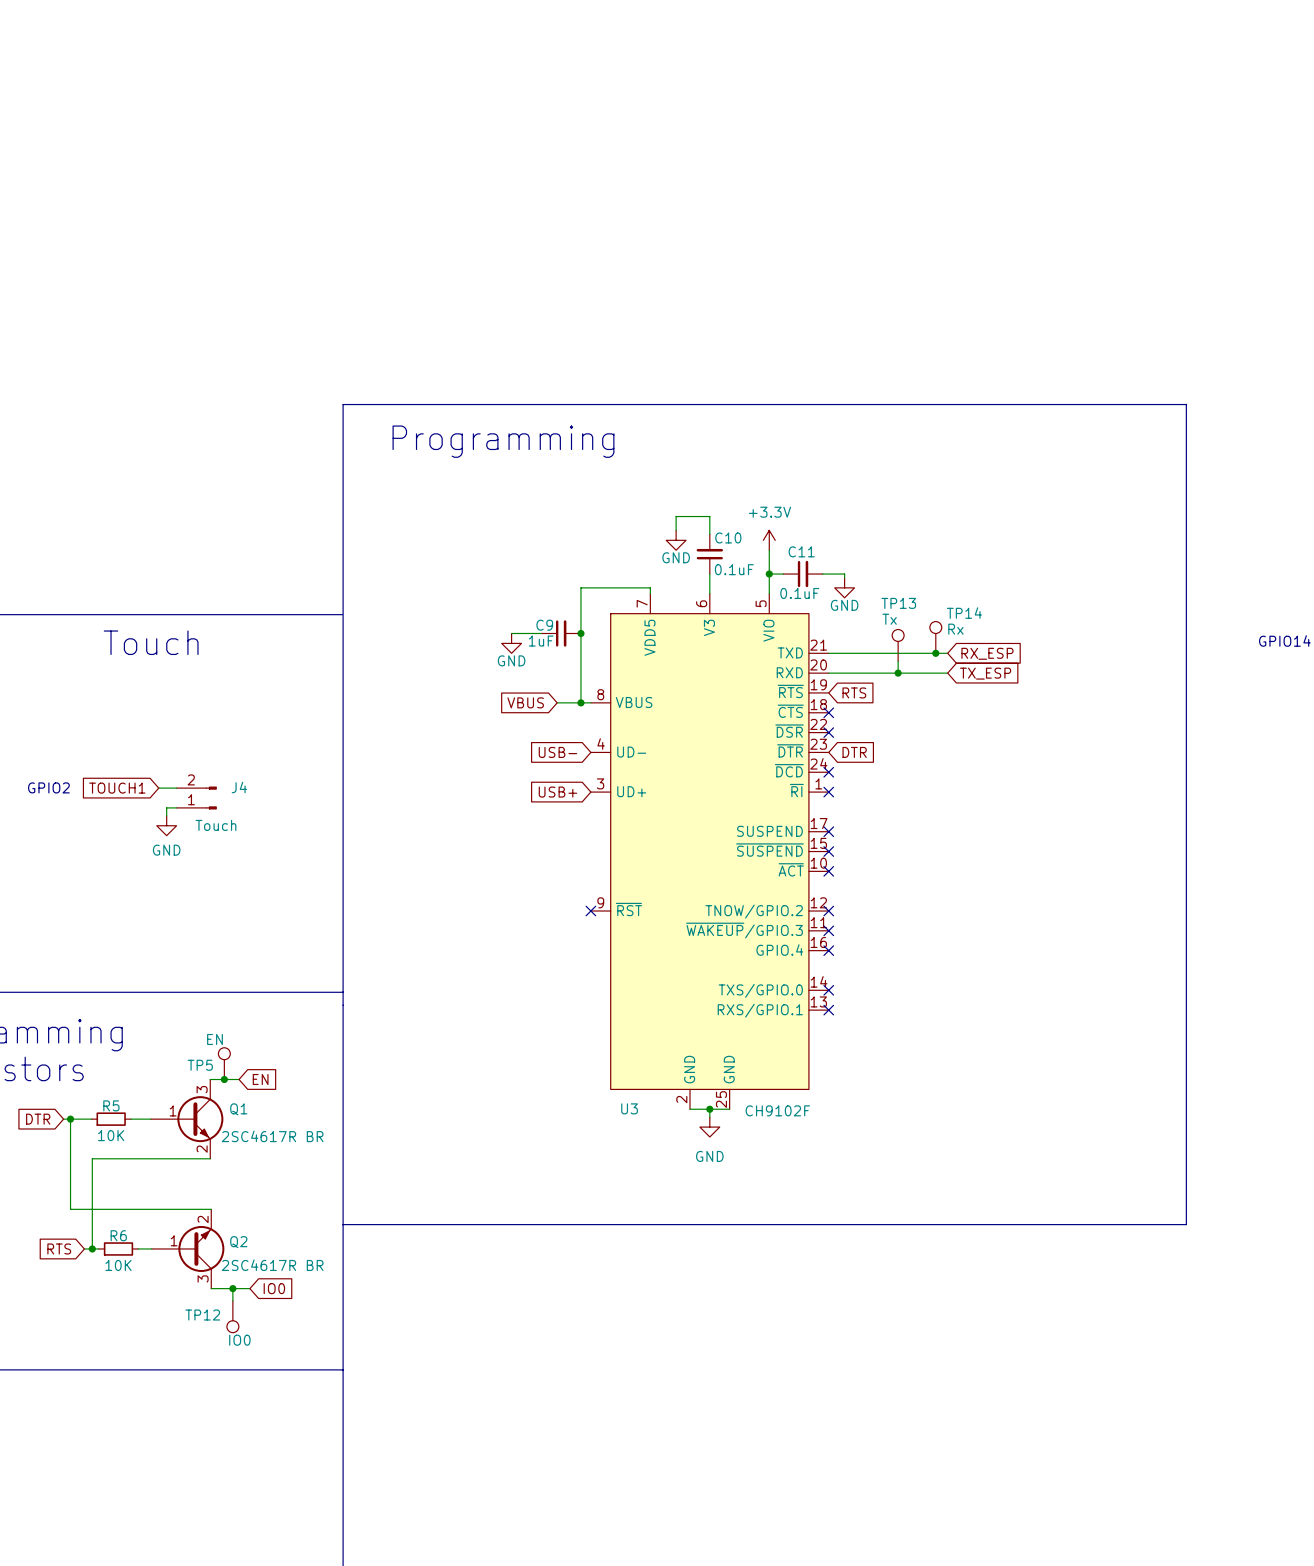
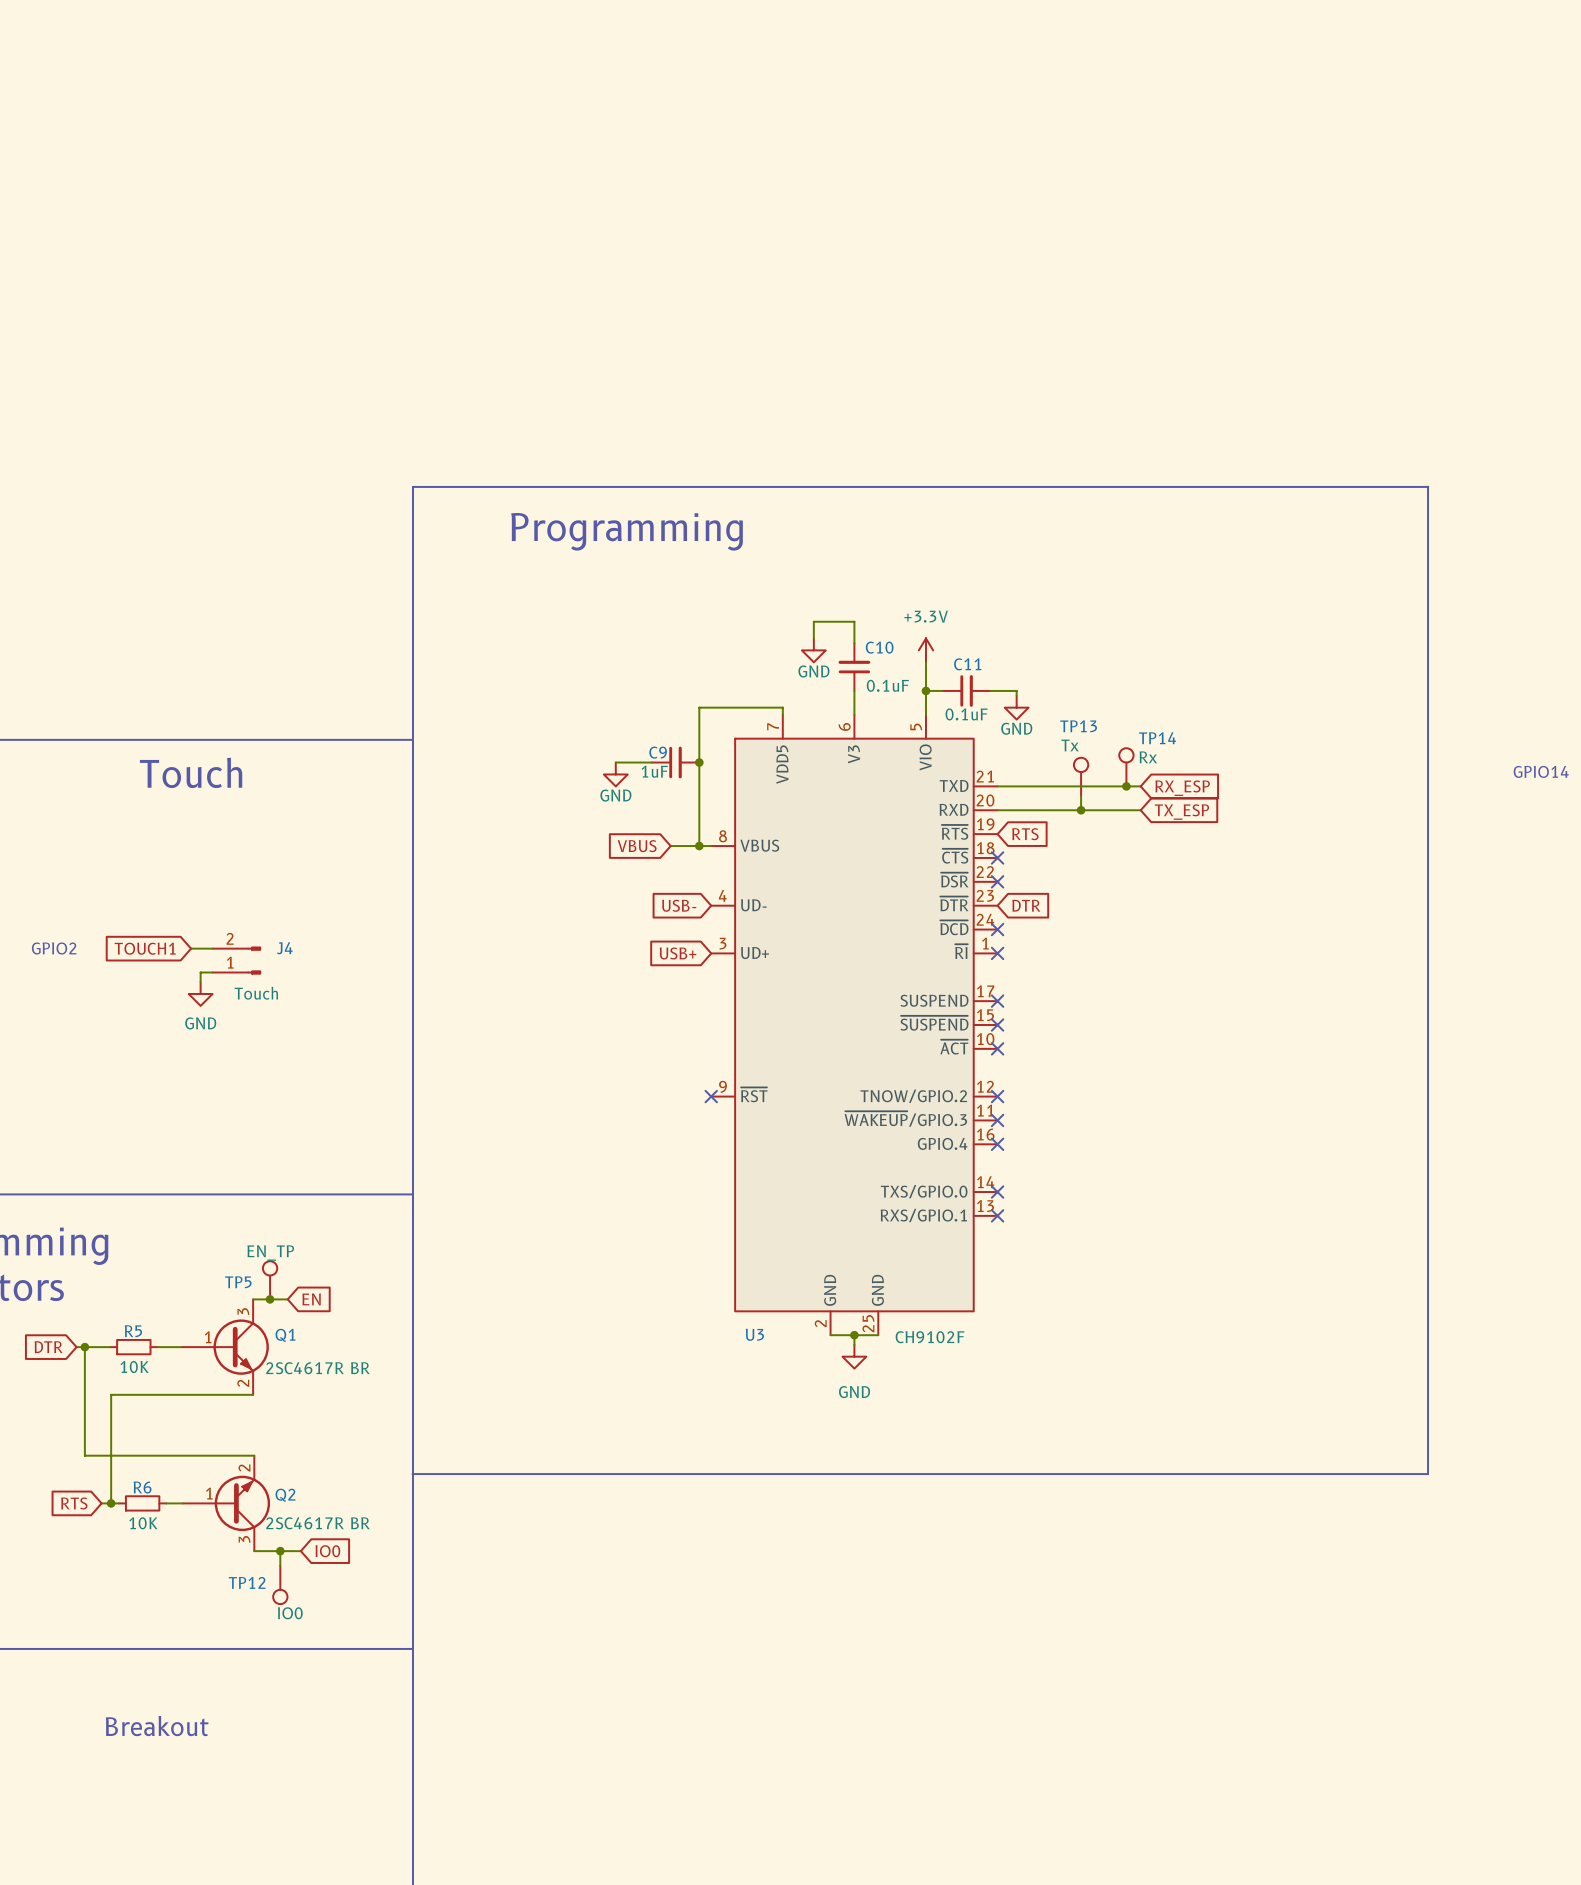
TP5 value: EN (214, 1039) -> EN_TP (270, 1253)
text: none -> Breakout (157, 1726)

